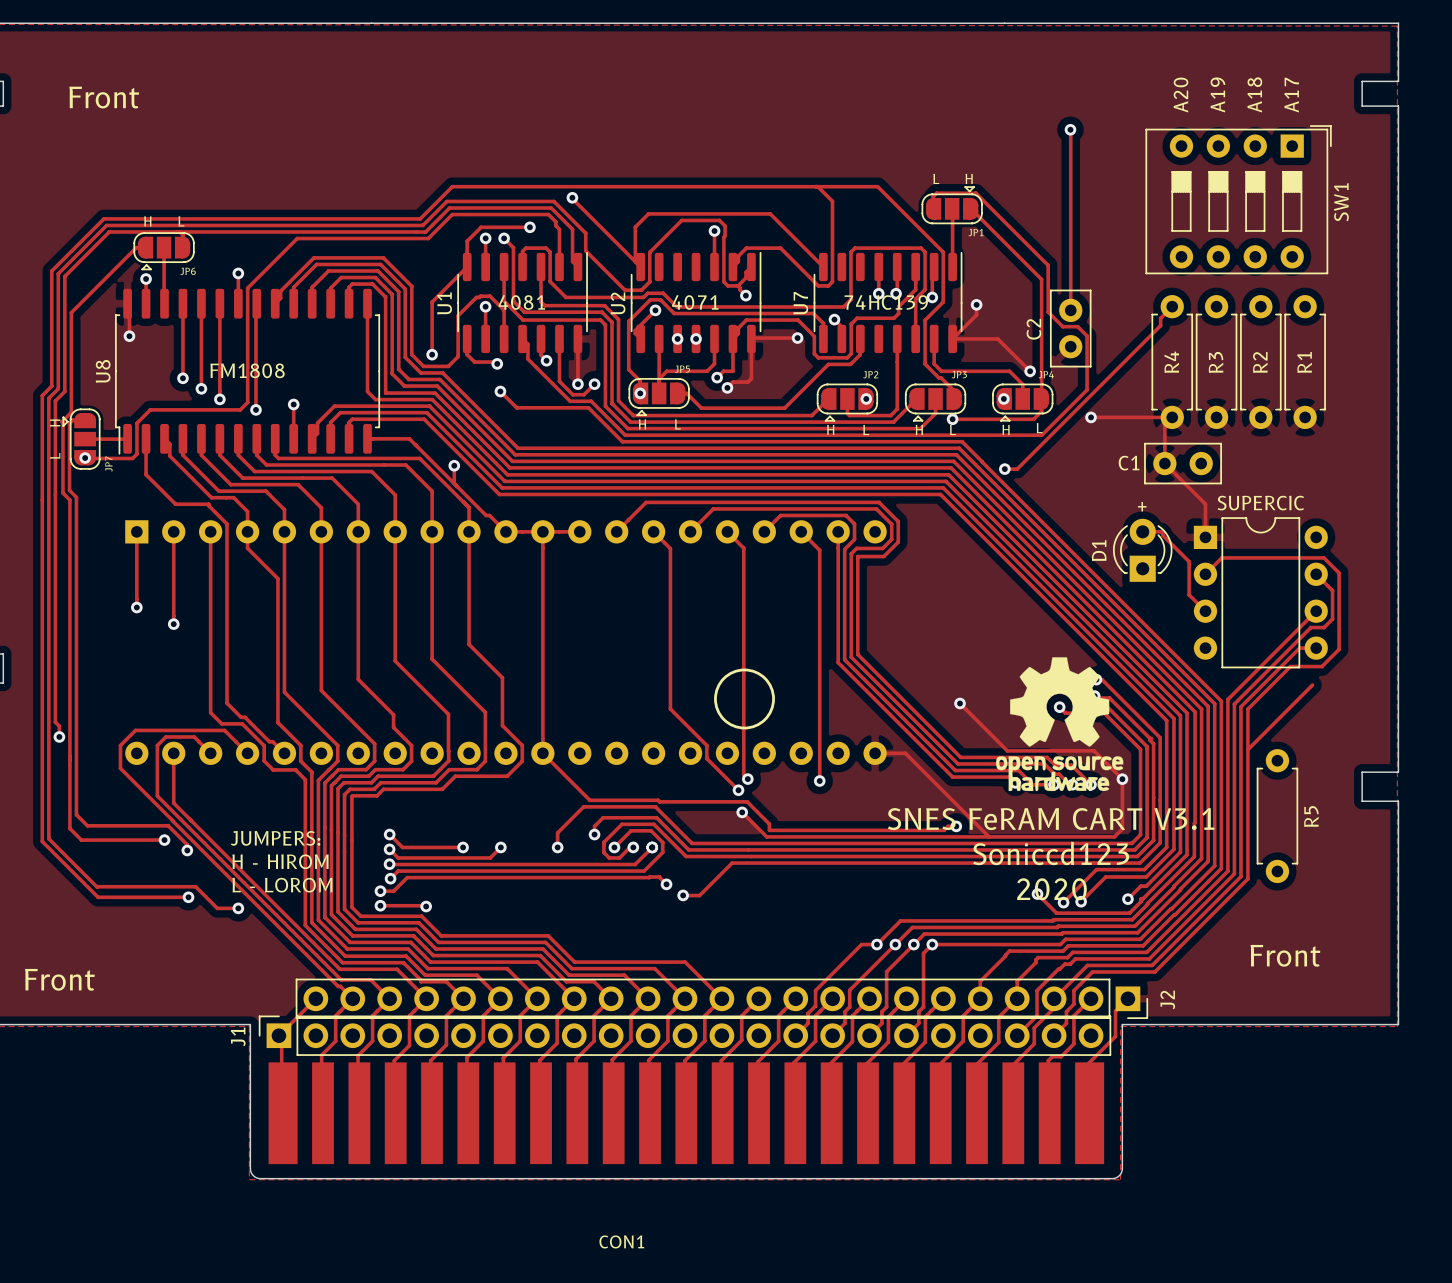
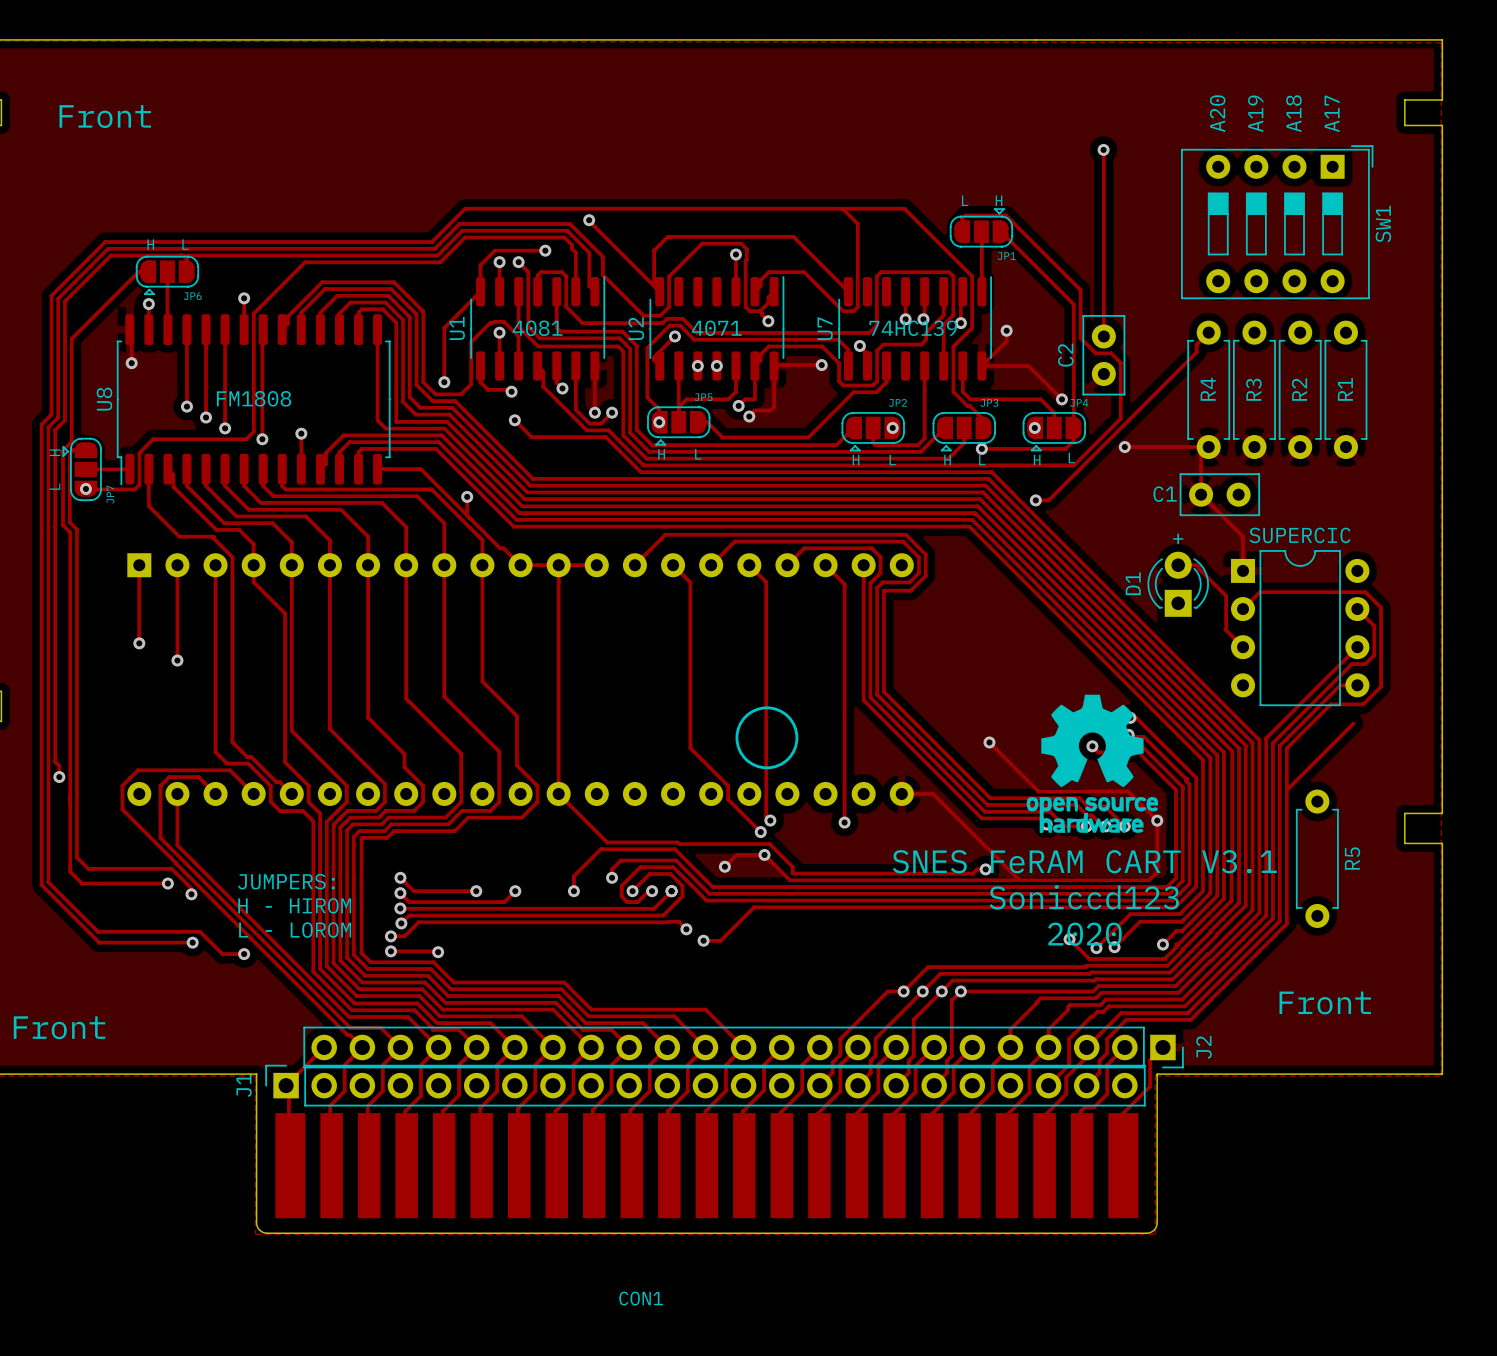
track: none -> (764, 854) (736, 854) (724, 866)
via: none -> (724, 866)

